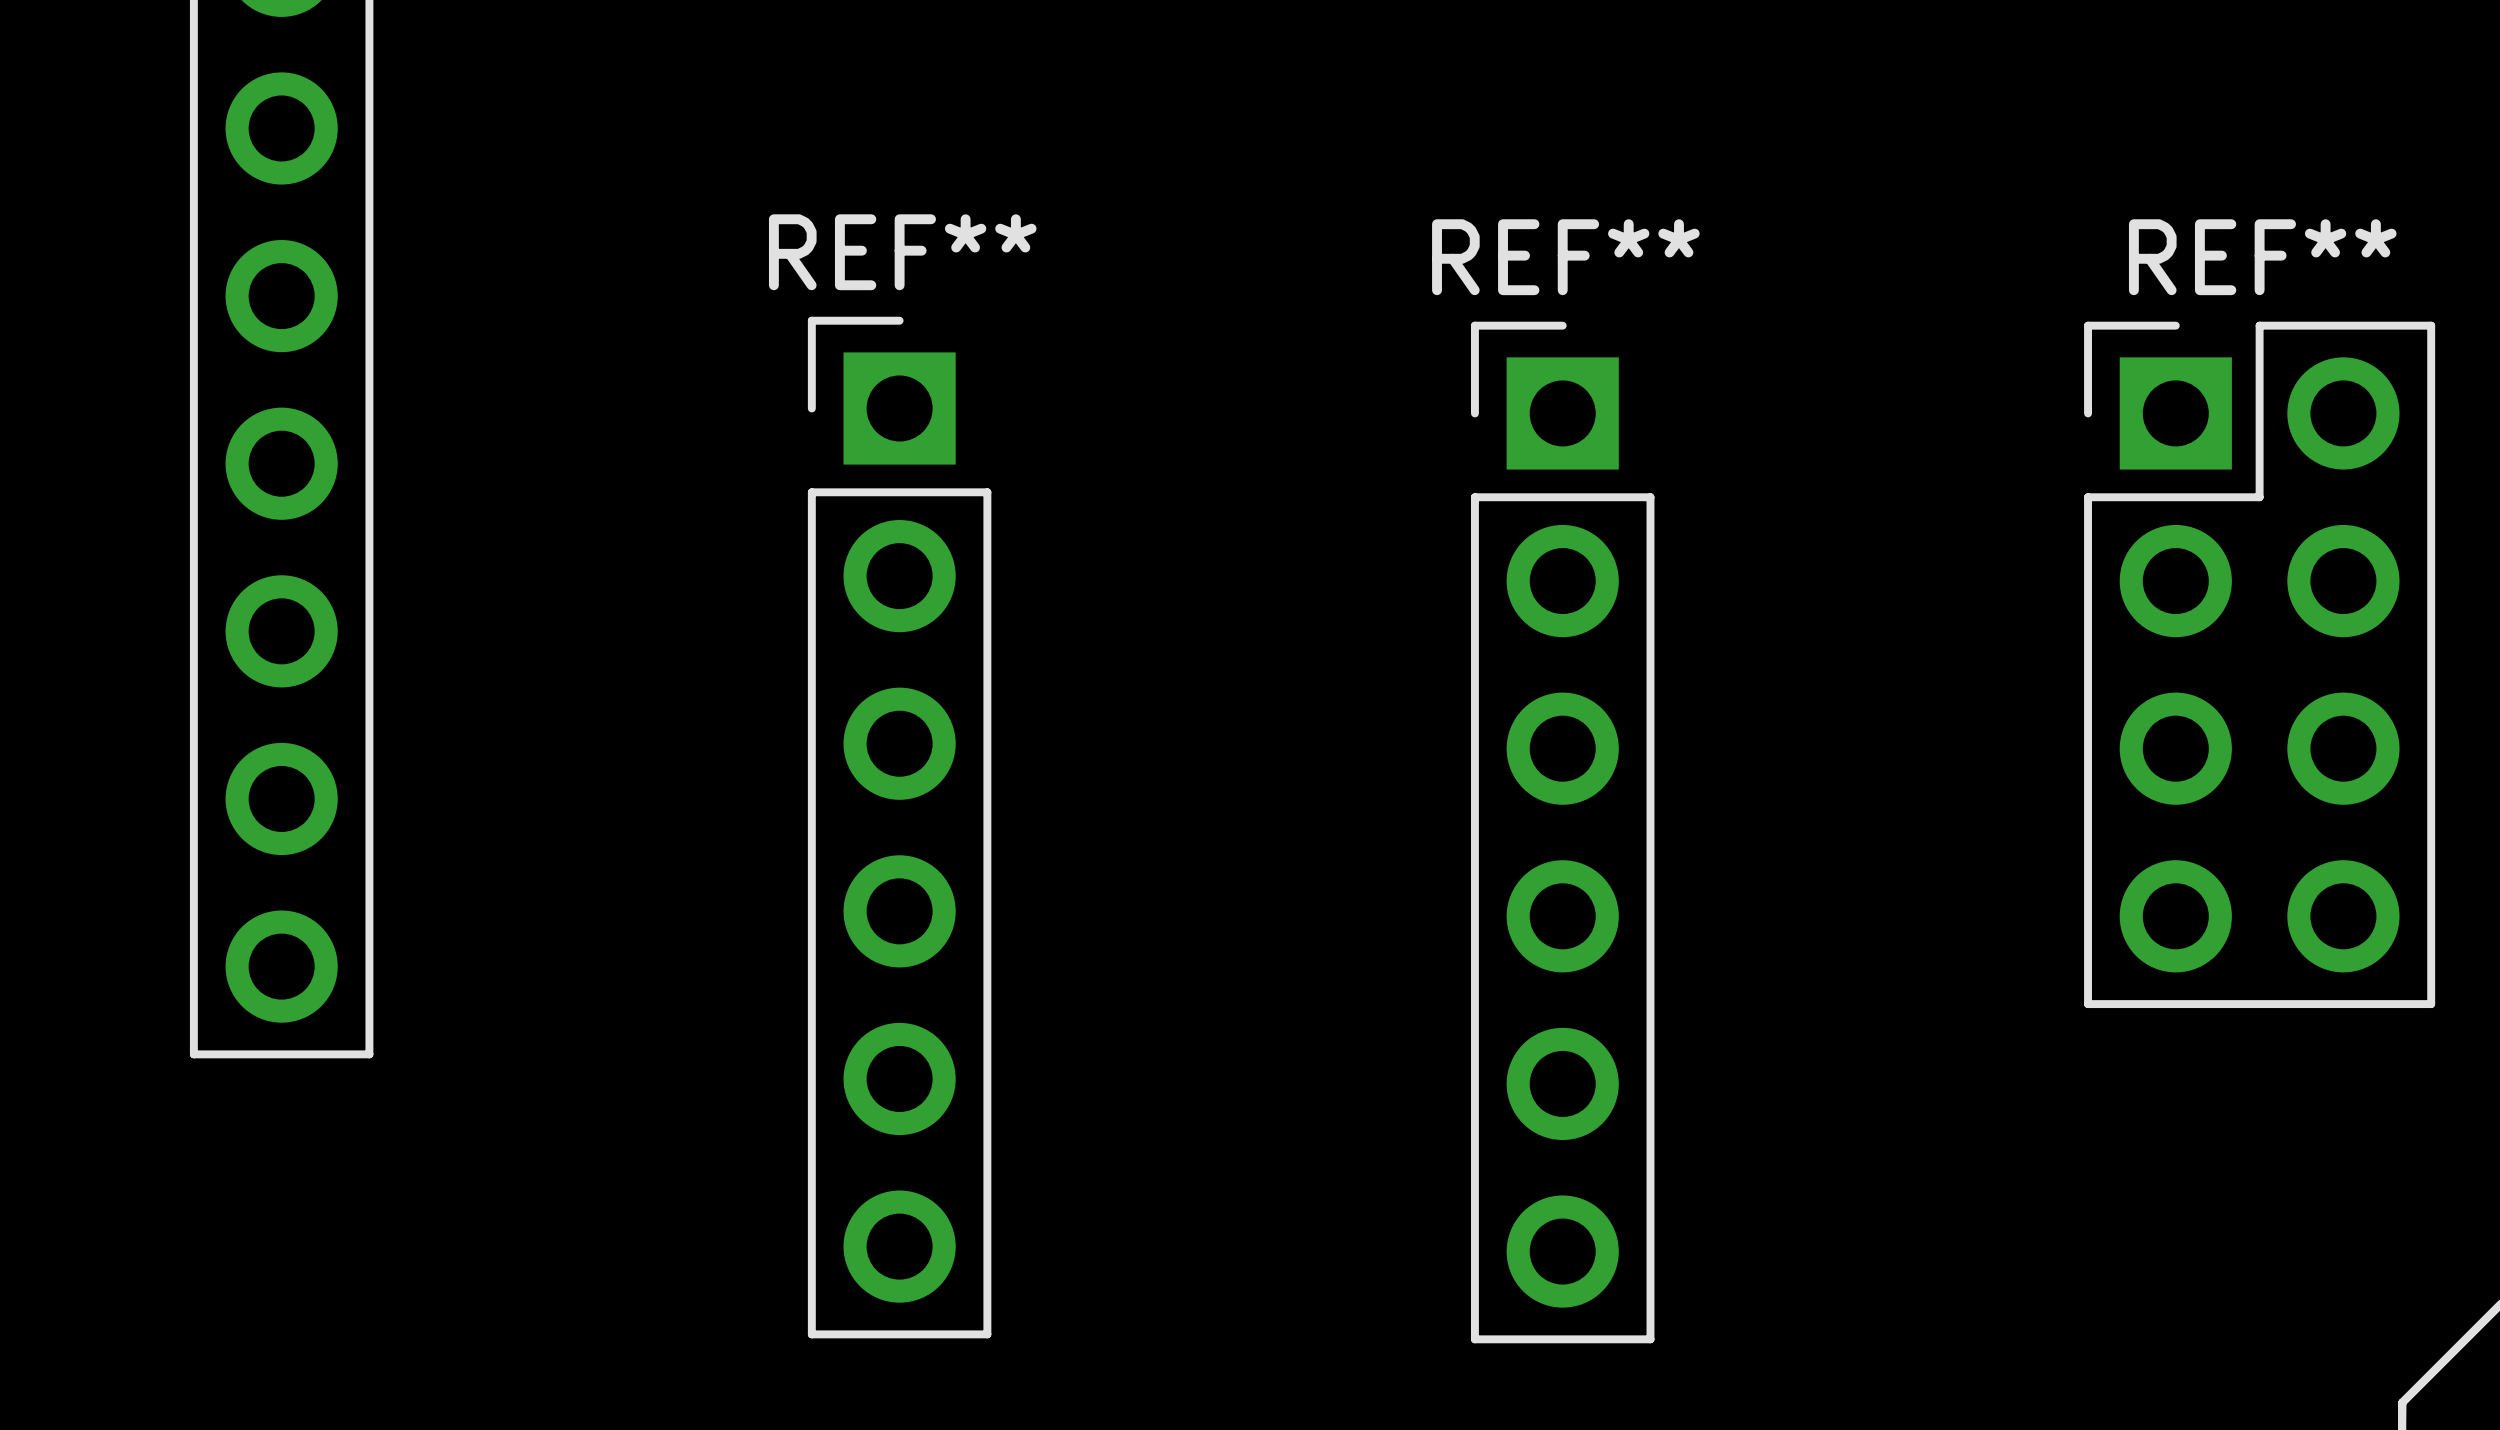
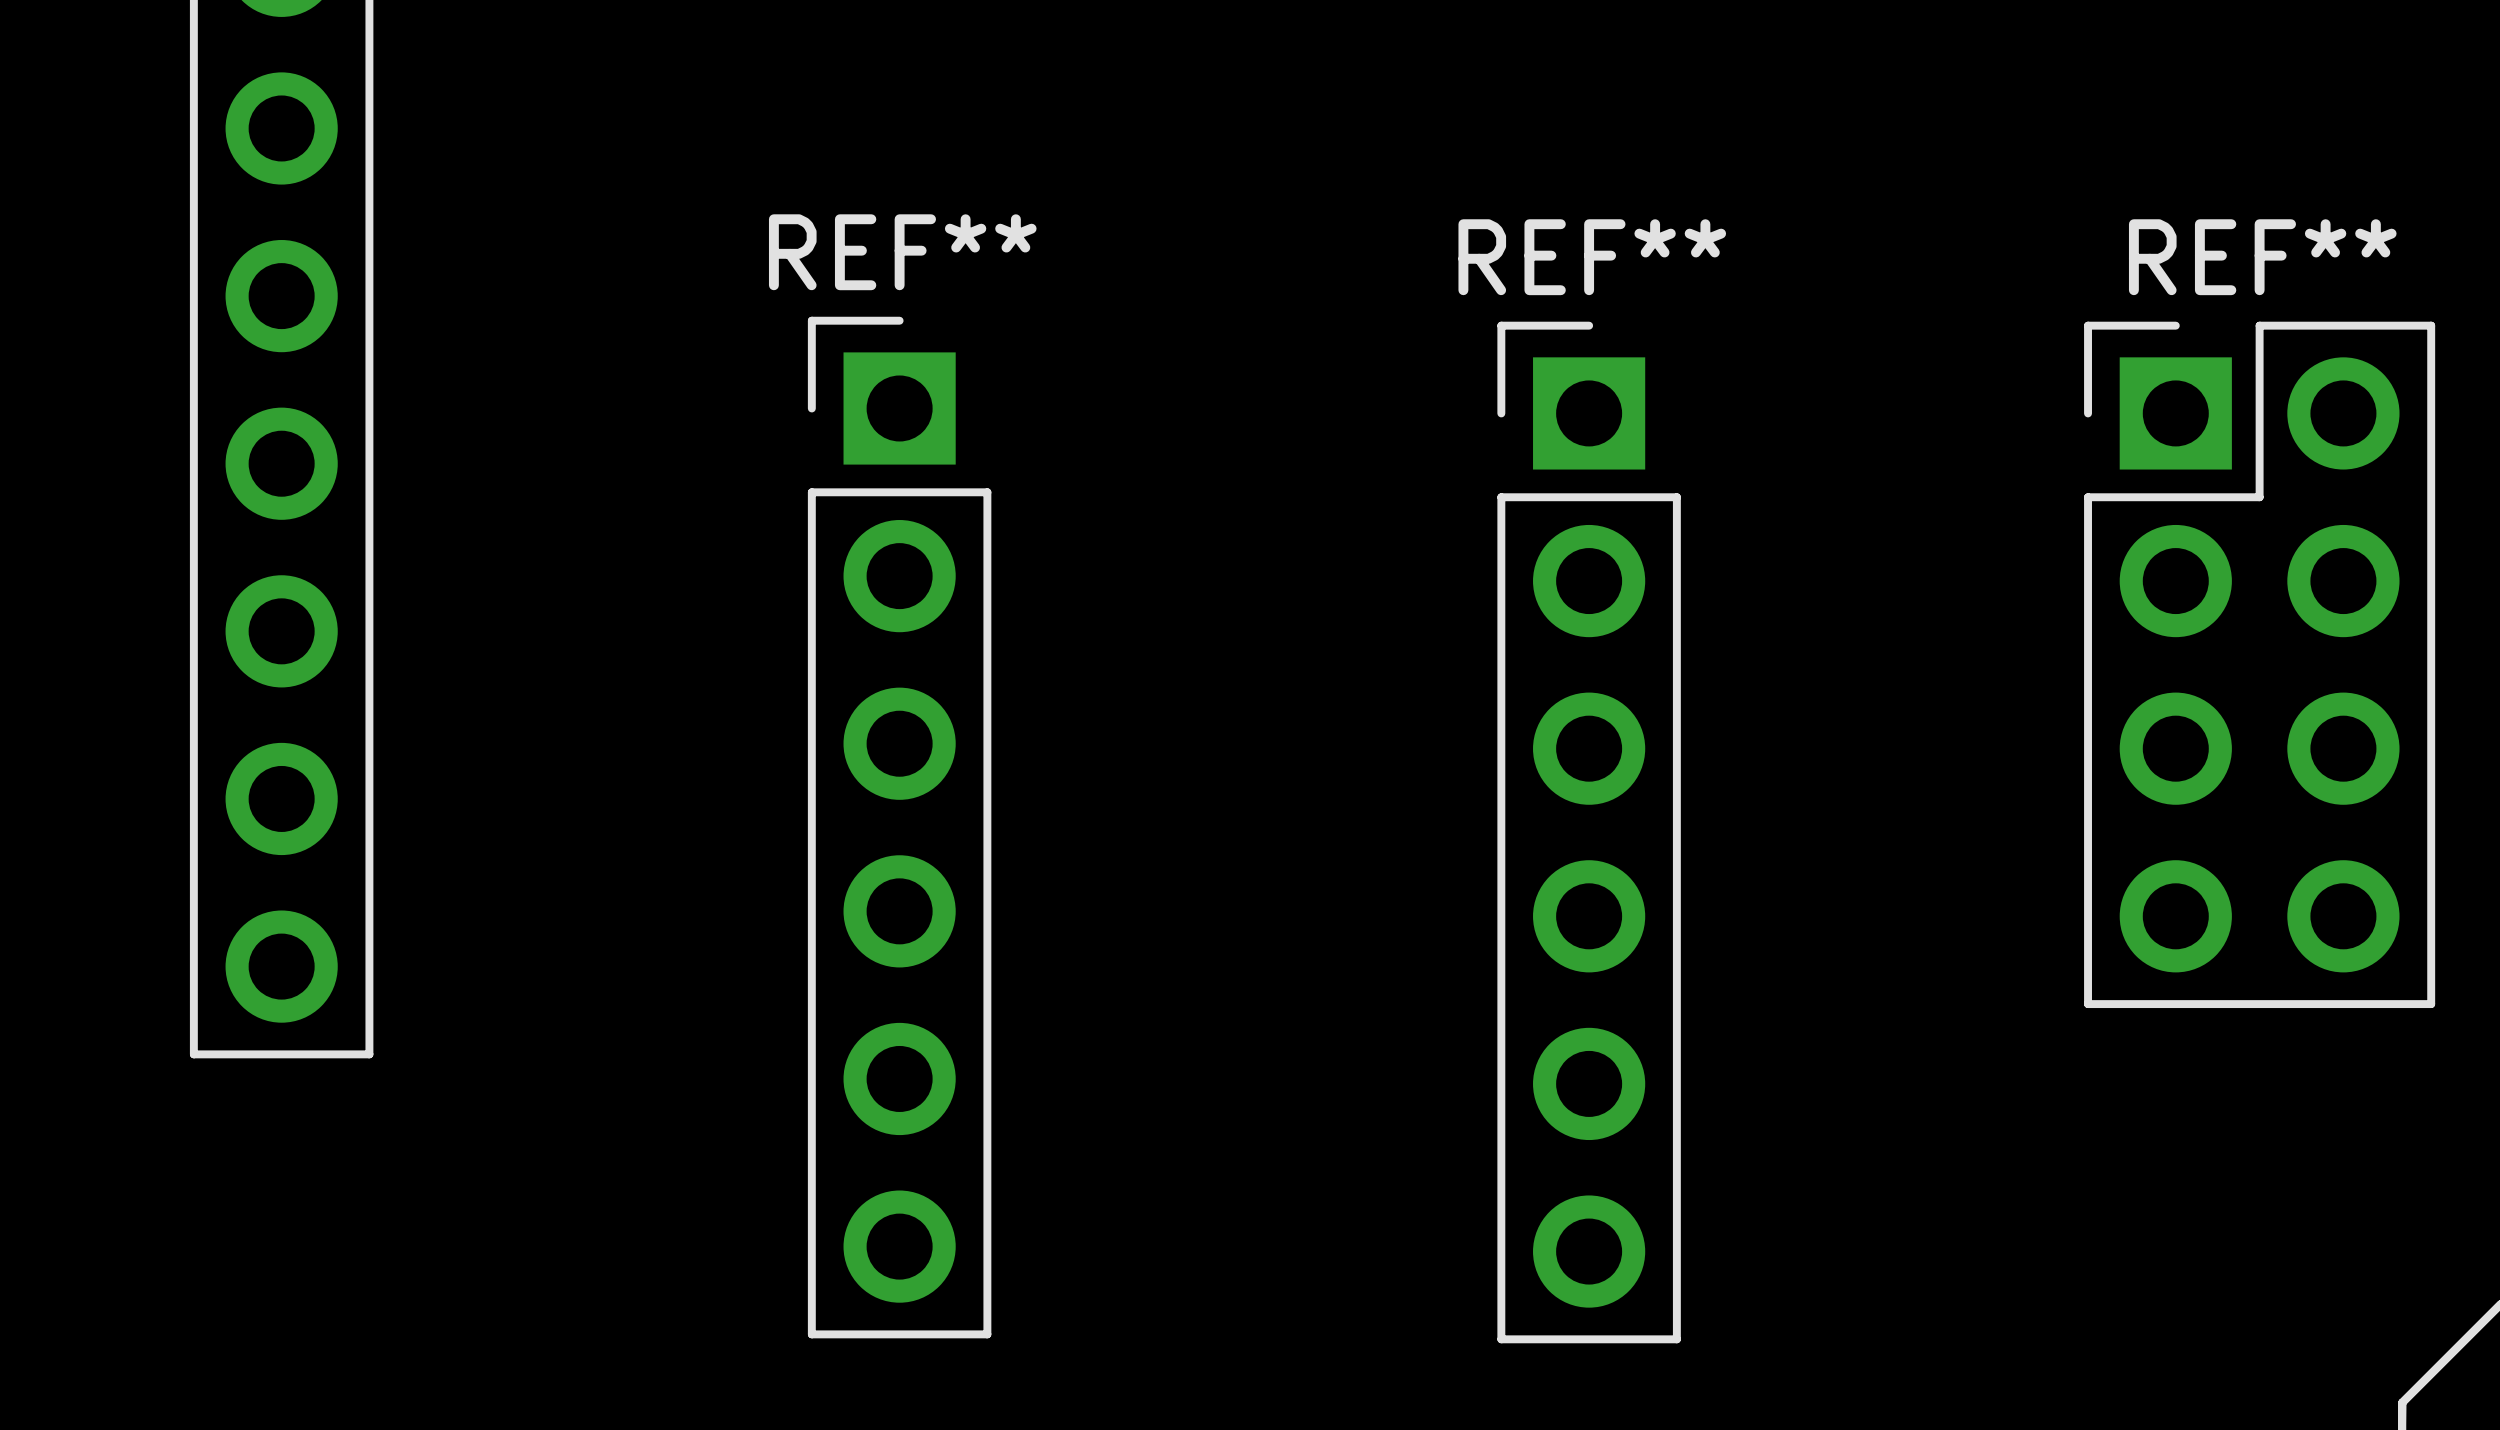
REF** position: (1562, 832) -> (1589, 832)

